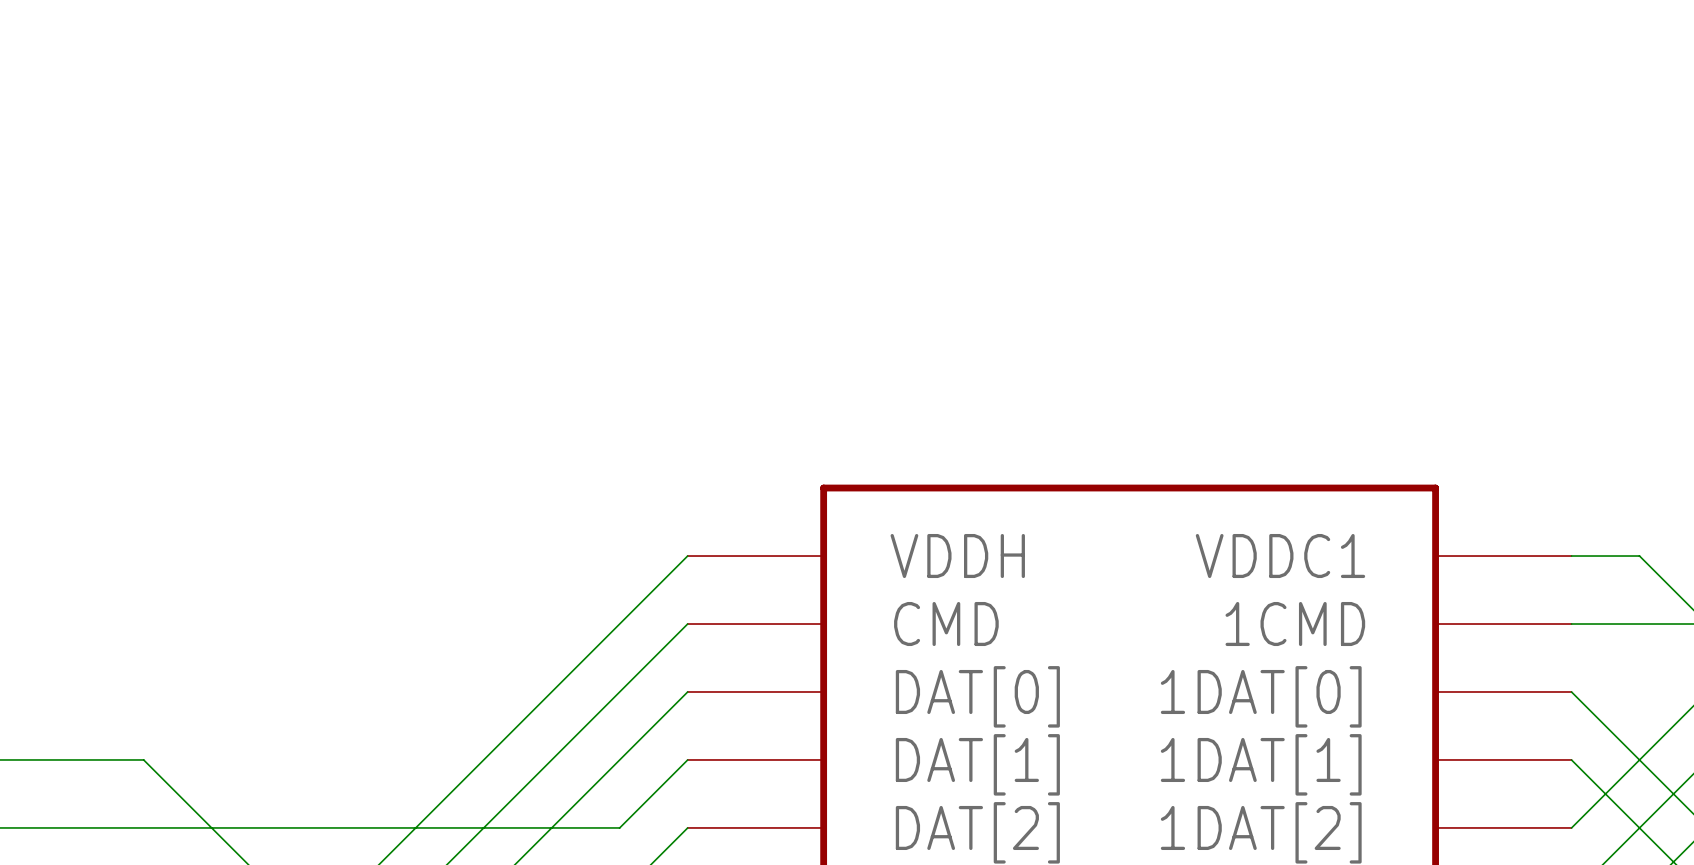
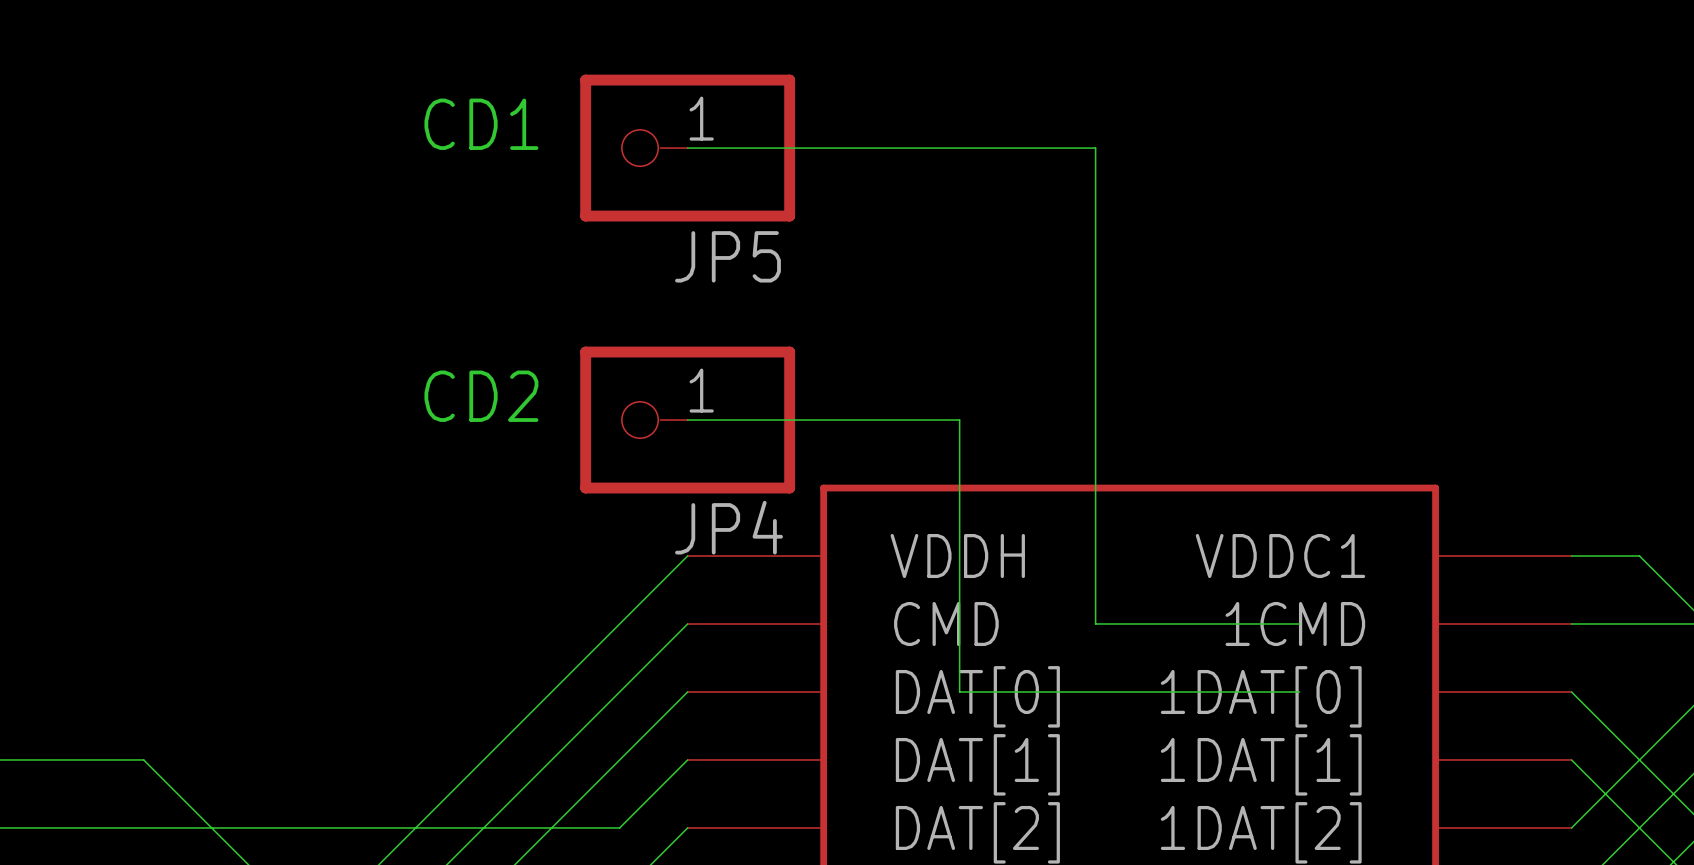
text: none -> CD1 (481, 124)
wire: none -> (687, 148) (1095, 148) (1095, 624) (1299, 624)
JP5: none -> (687, 148)
text: none -> CD2 (481, 396)
wire: none -> (687, 420) (959, 420) (959, 691) (1299, 691)
JP4: none -> (687, 420)

